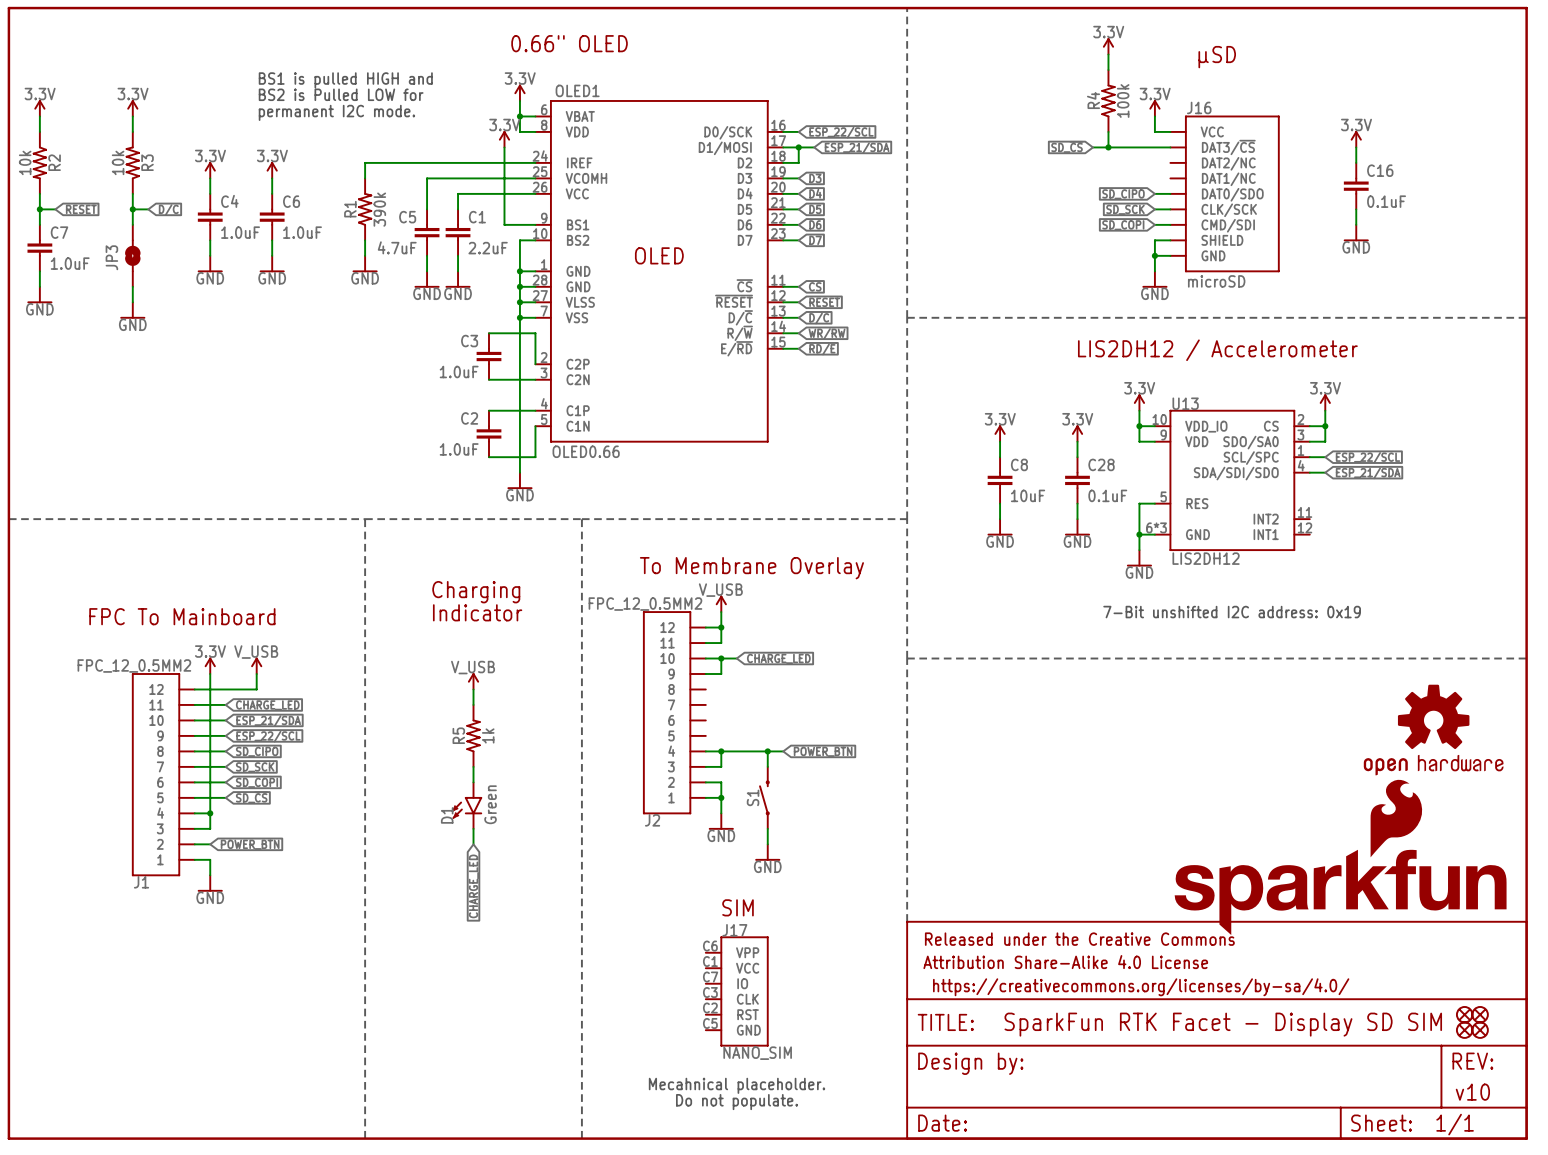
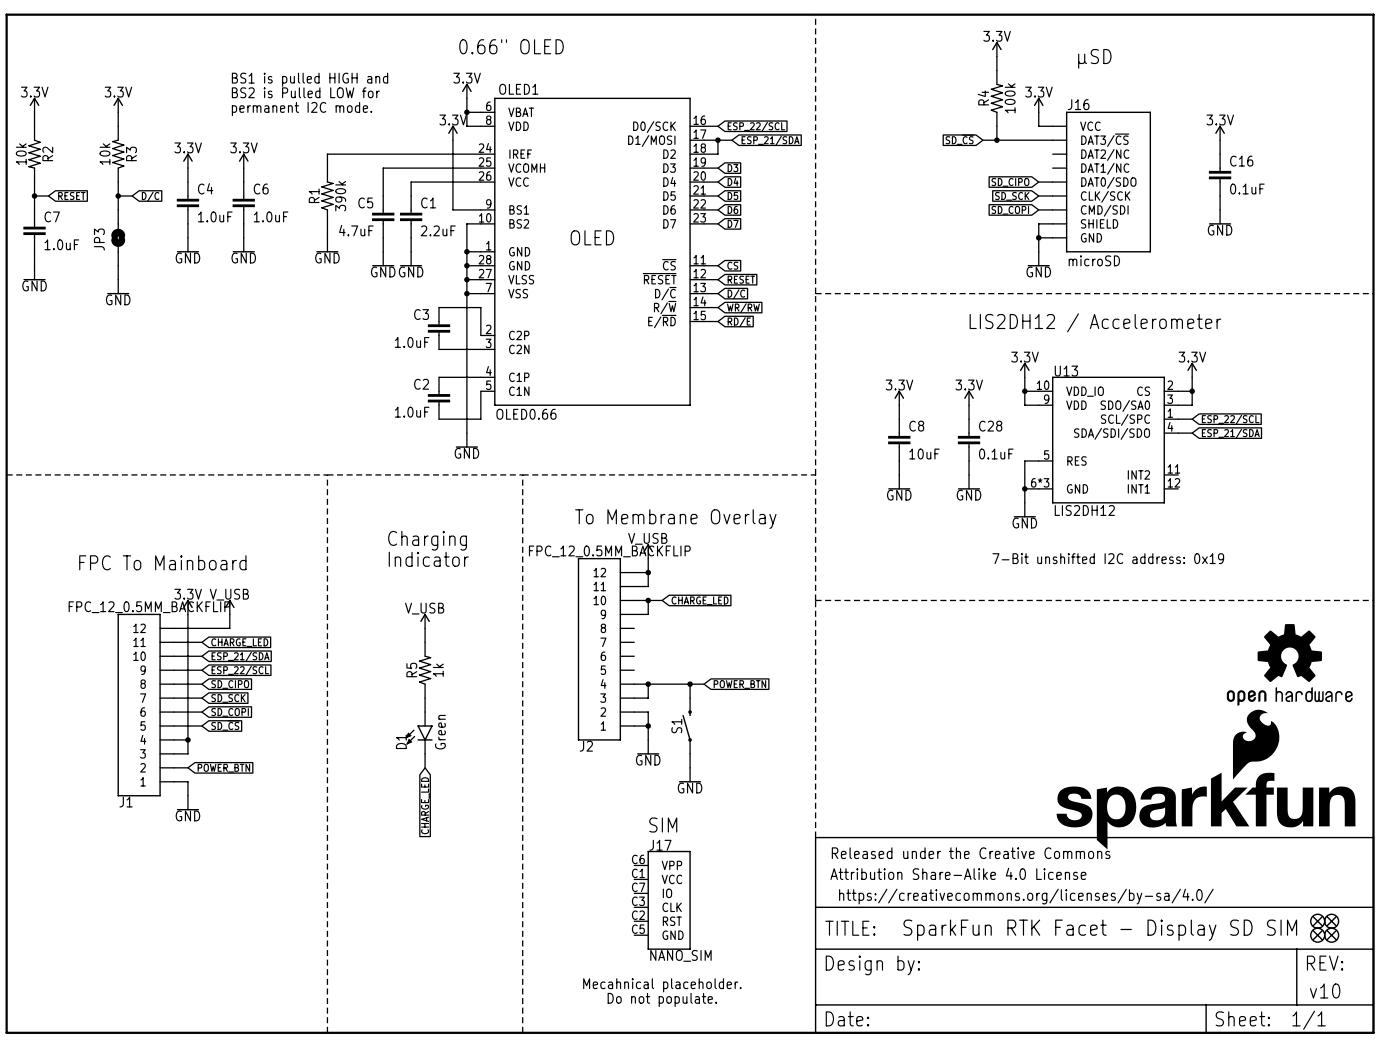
J2 value: FPC_12_0.5MM2 (645, 604) -> FPC_12_0.5MM_BACKFLIP (609, 551)
J1 value: FPC_12_0.5MM2 (134, 665) -> FPC_12_0.5MM_BACKFLIP (149, 607)

